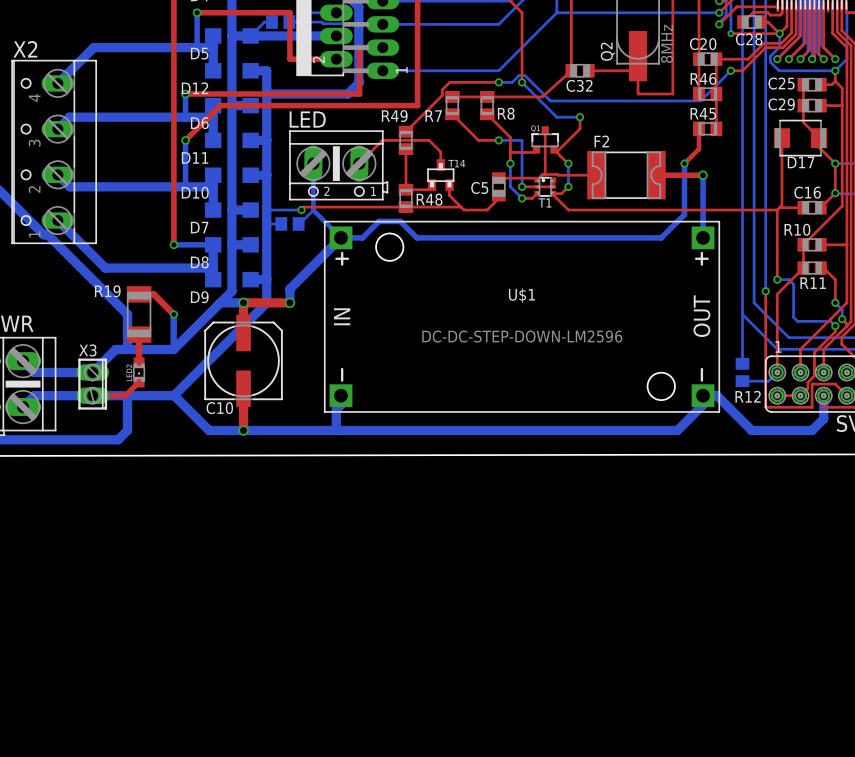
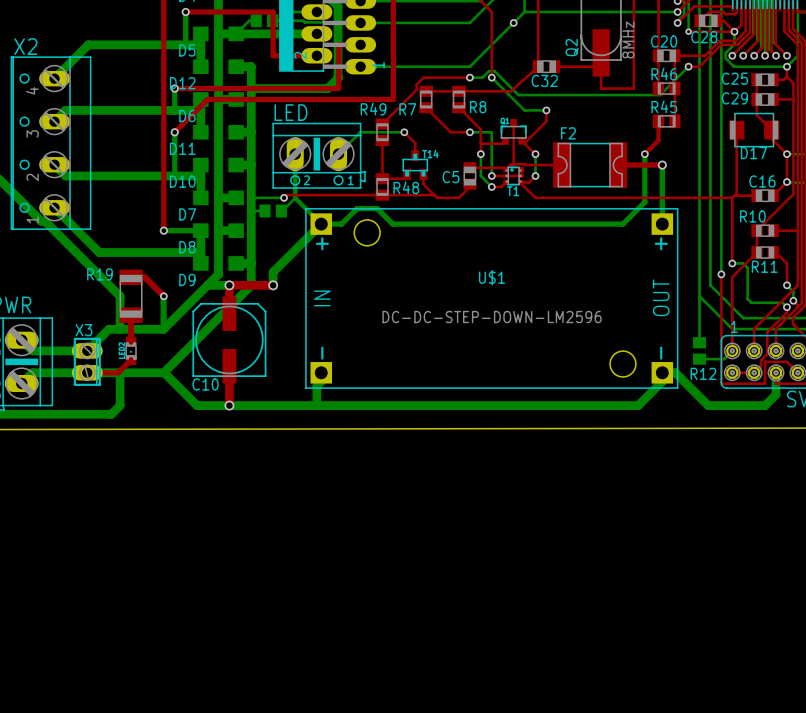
via: none -> (513, 22)
bottom track: none -> (404, 132) (360, 132) (338, 154)
top track: (429, 140) (382, 140) (359, 163) -> none
via: none -> (404, 132)

